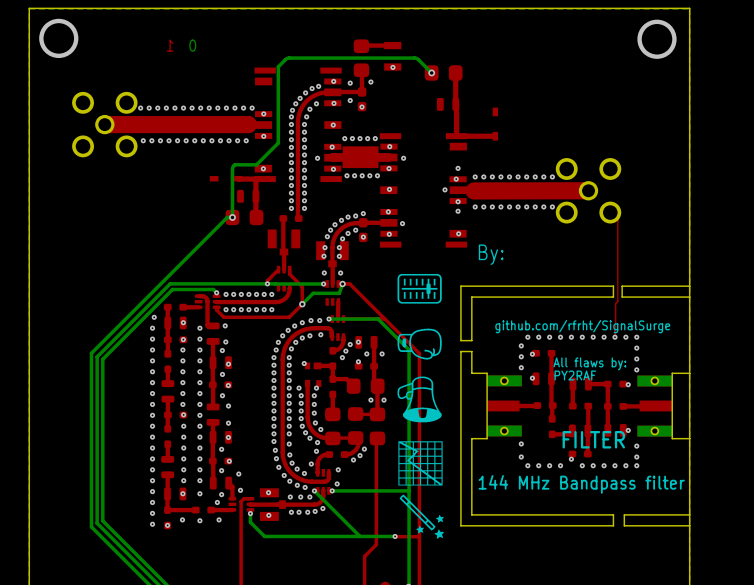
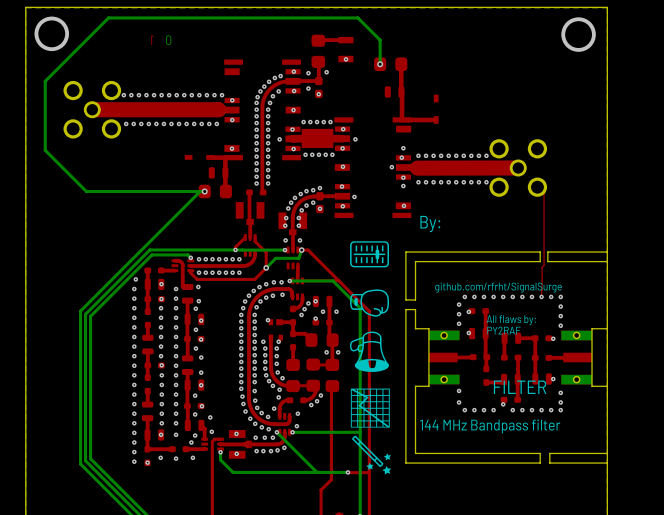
bottom track: (431, 72) (415, 58) (286, 59) (278, 66) (278, 143) (256, 164) (234, 164) (233, 166) (232, 217) -> (380, 64) (380, 40) (357, 17) (108, 17) (45, 81) (45, 150) (86, 191) (200, 191)

